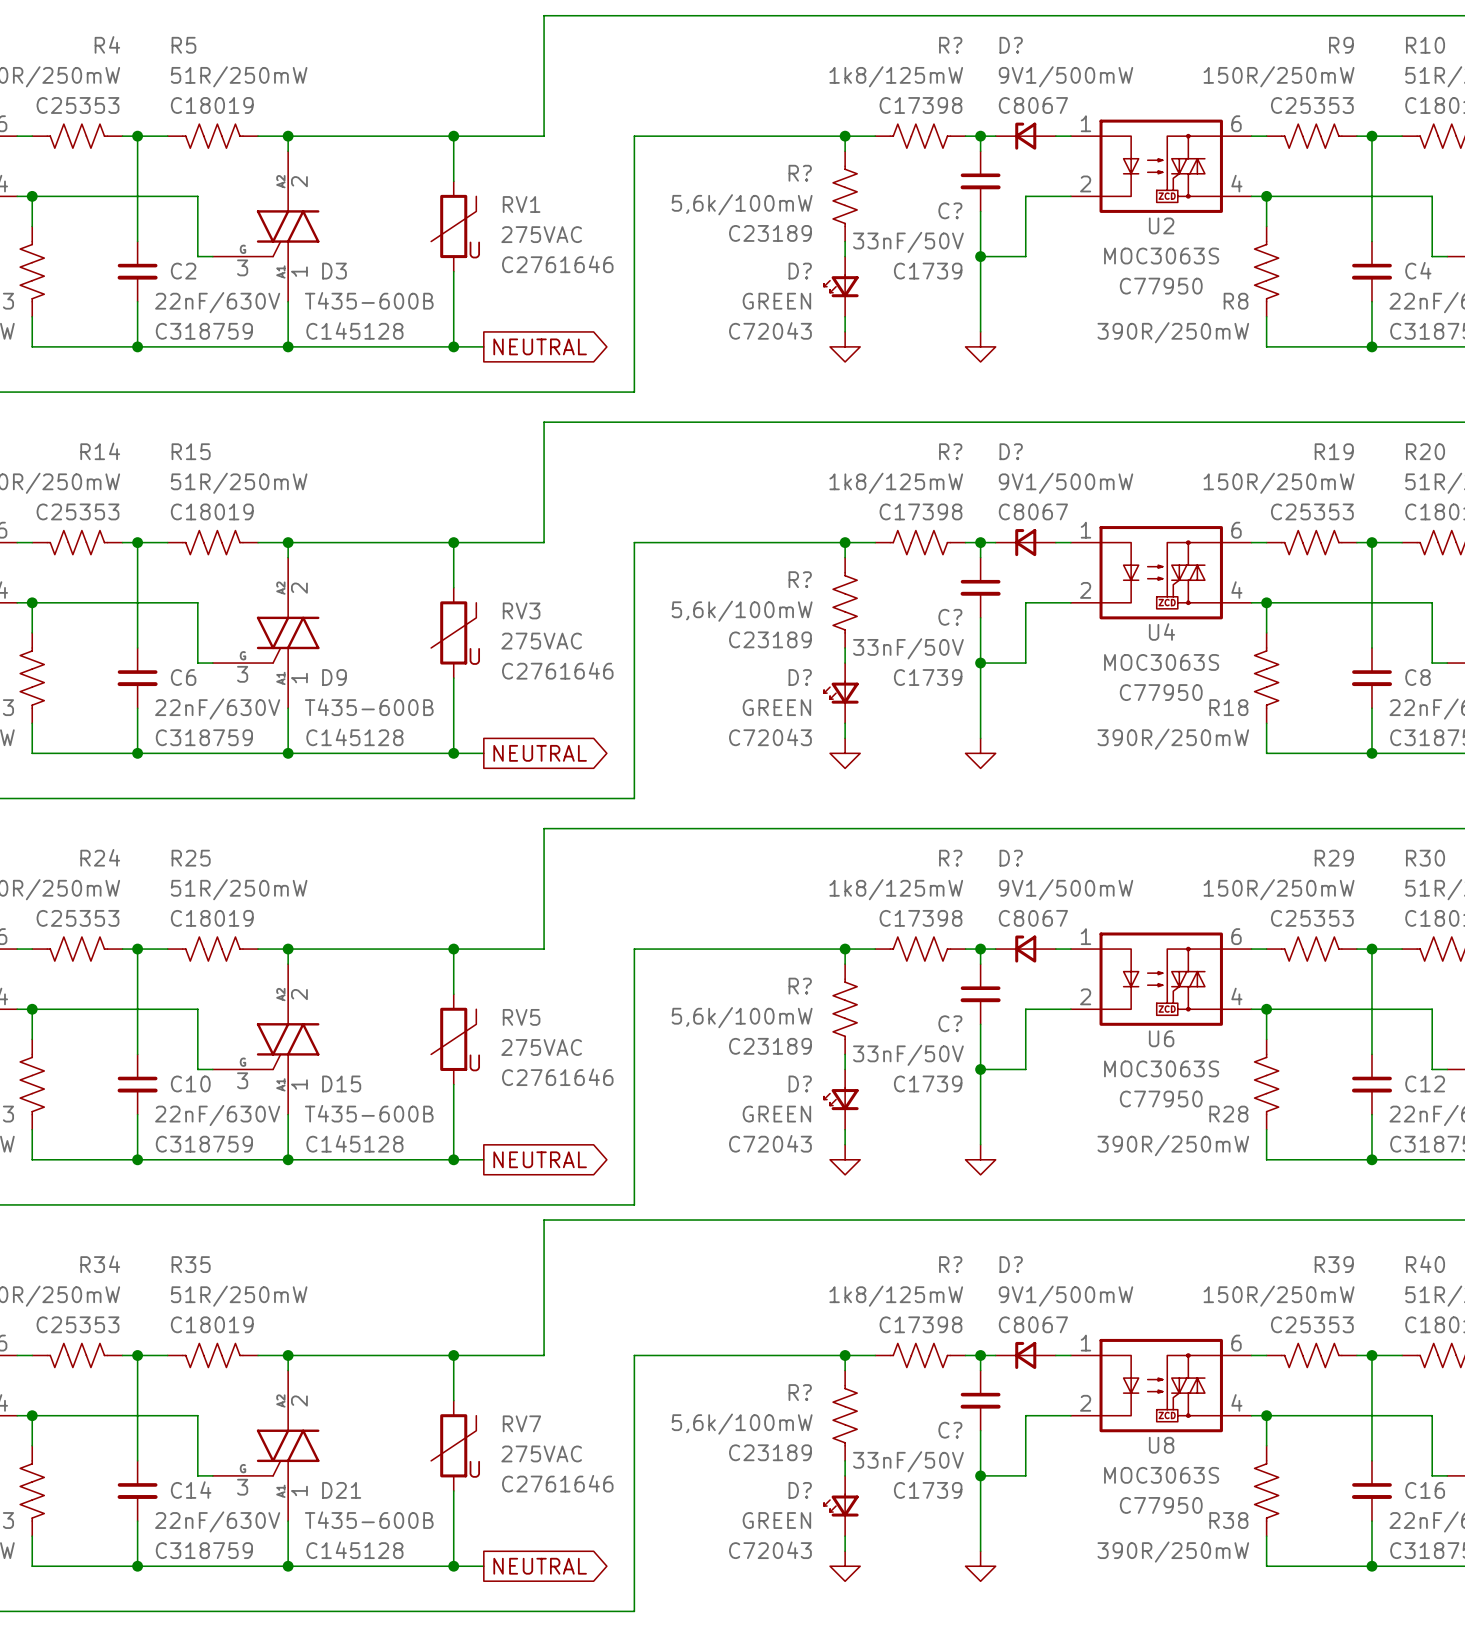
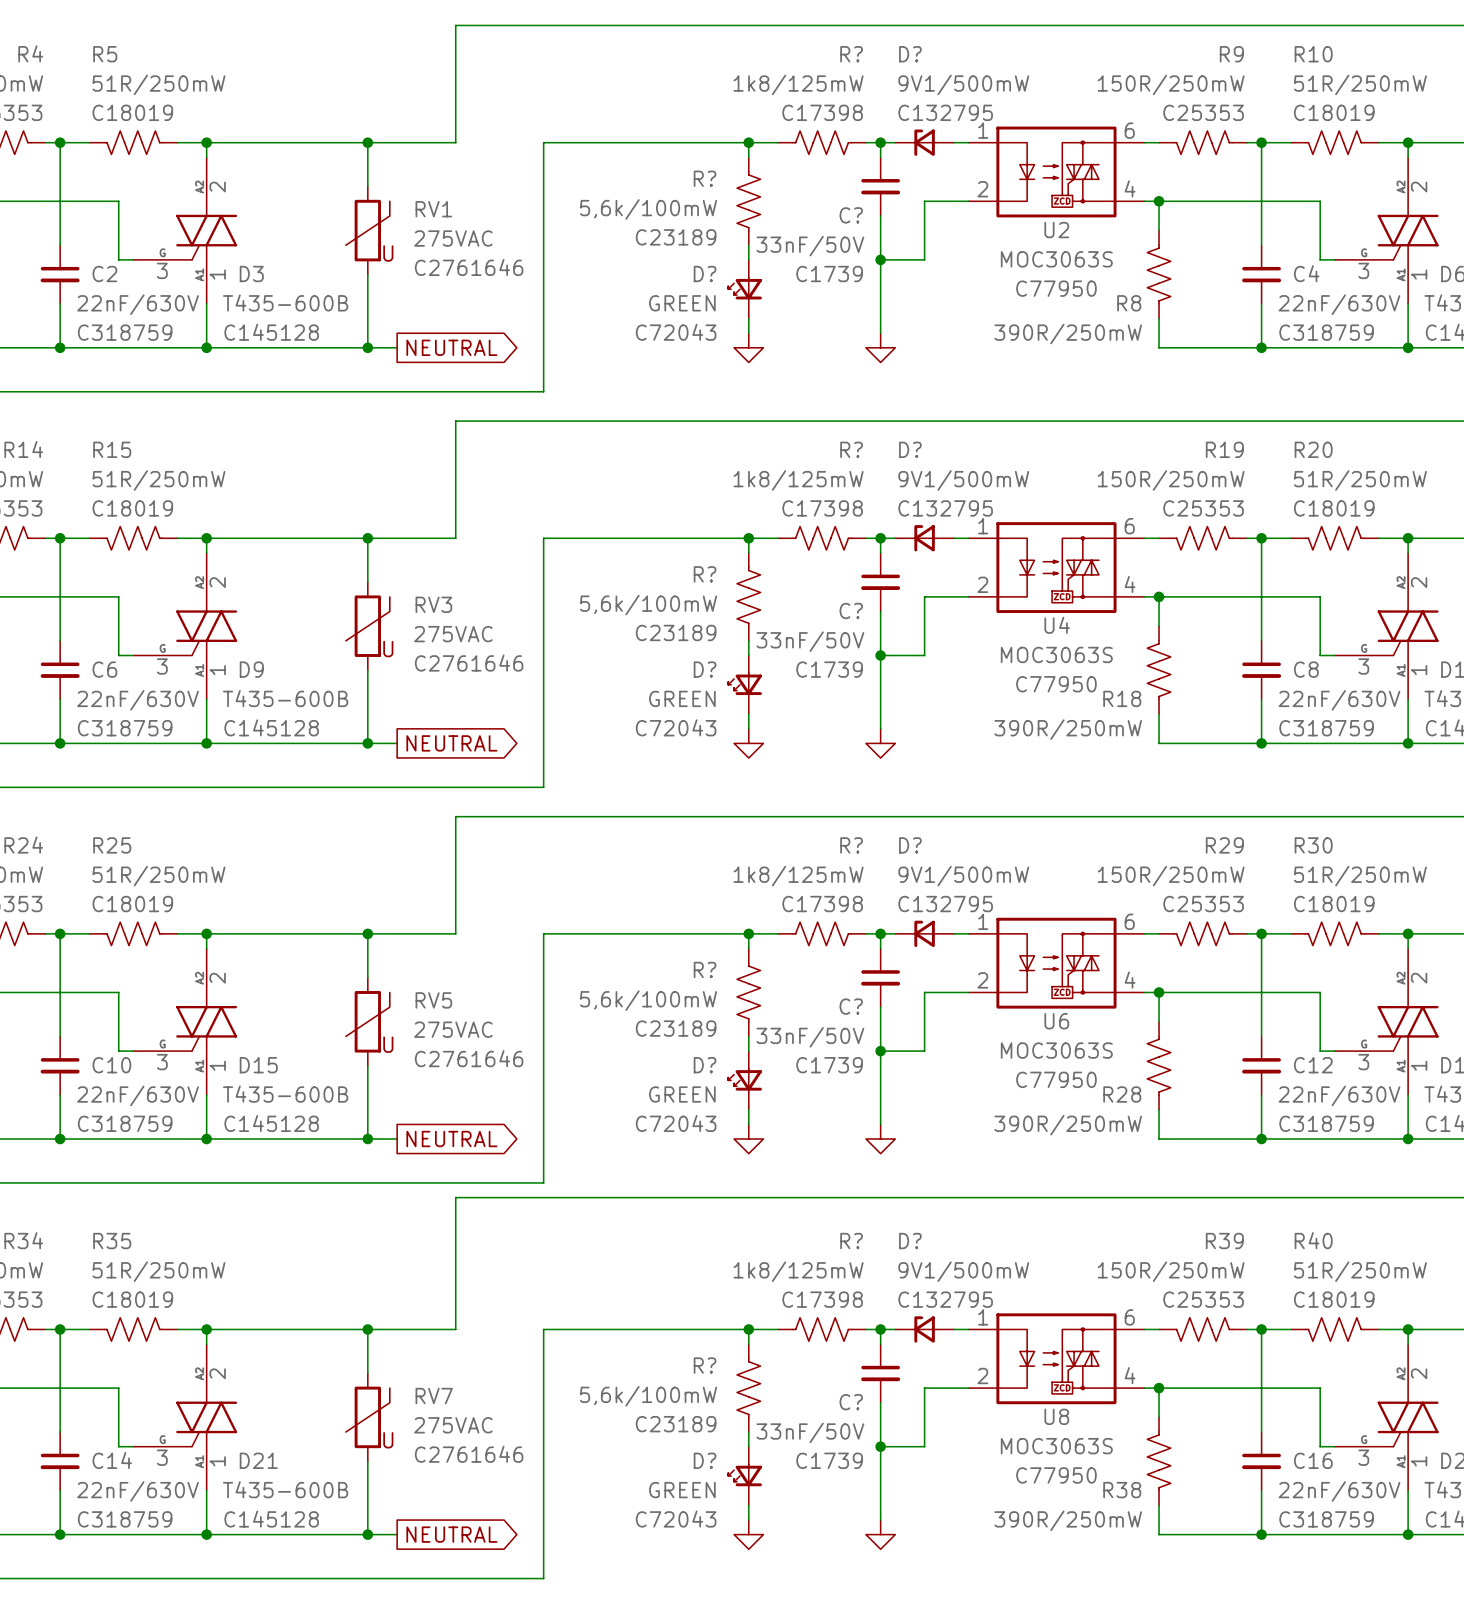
D? text: C8067 (1033, 105) -> C132795 (945, 112)
D? text: C8067 (1033, 511) -> C132795 (945, 508)
D? text: C8067 (1033, 918) -> C132795 (945, 904)
D? text: C8067 (1033, 1324) -> C132795 (945, 1299)

